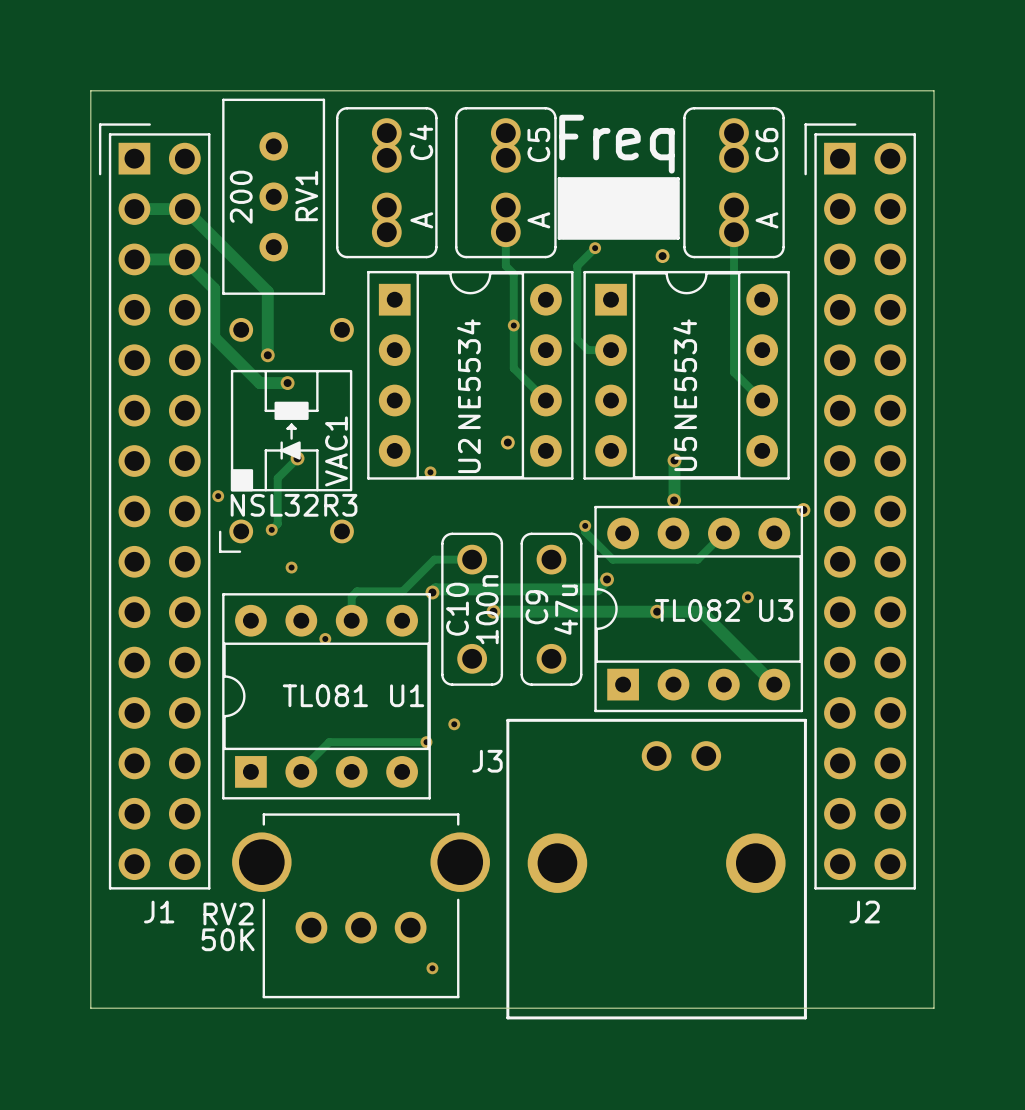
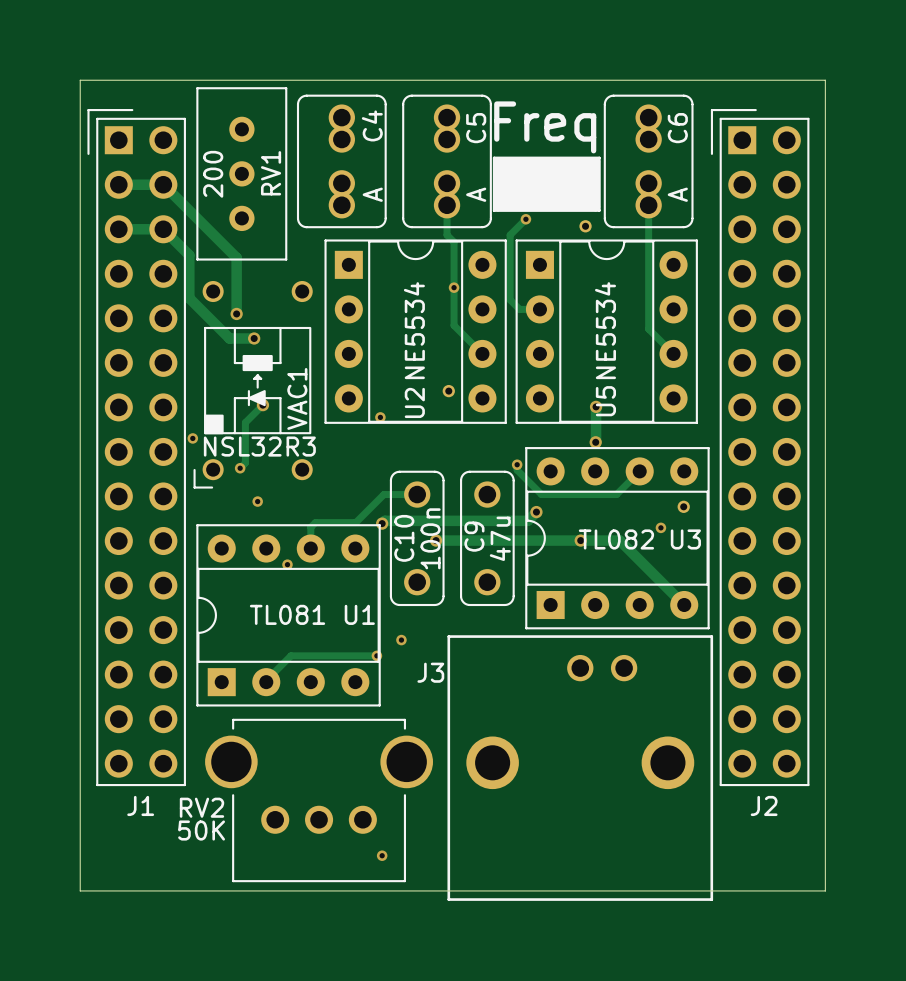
part position: (803, 510) -> (683, 506)

